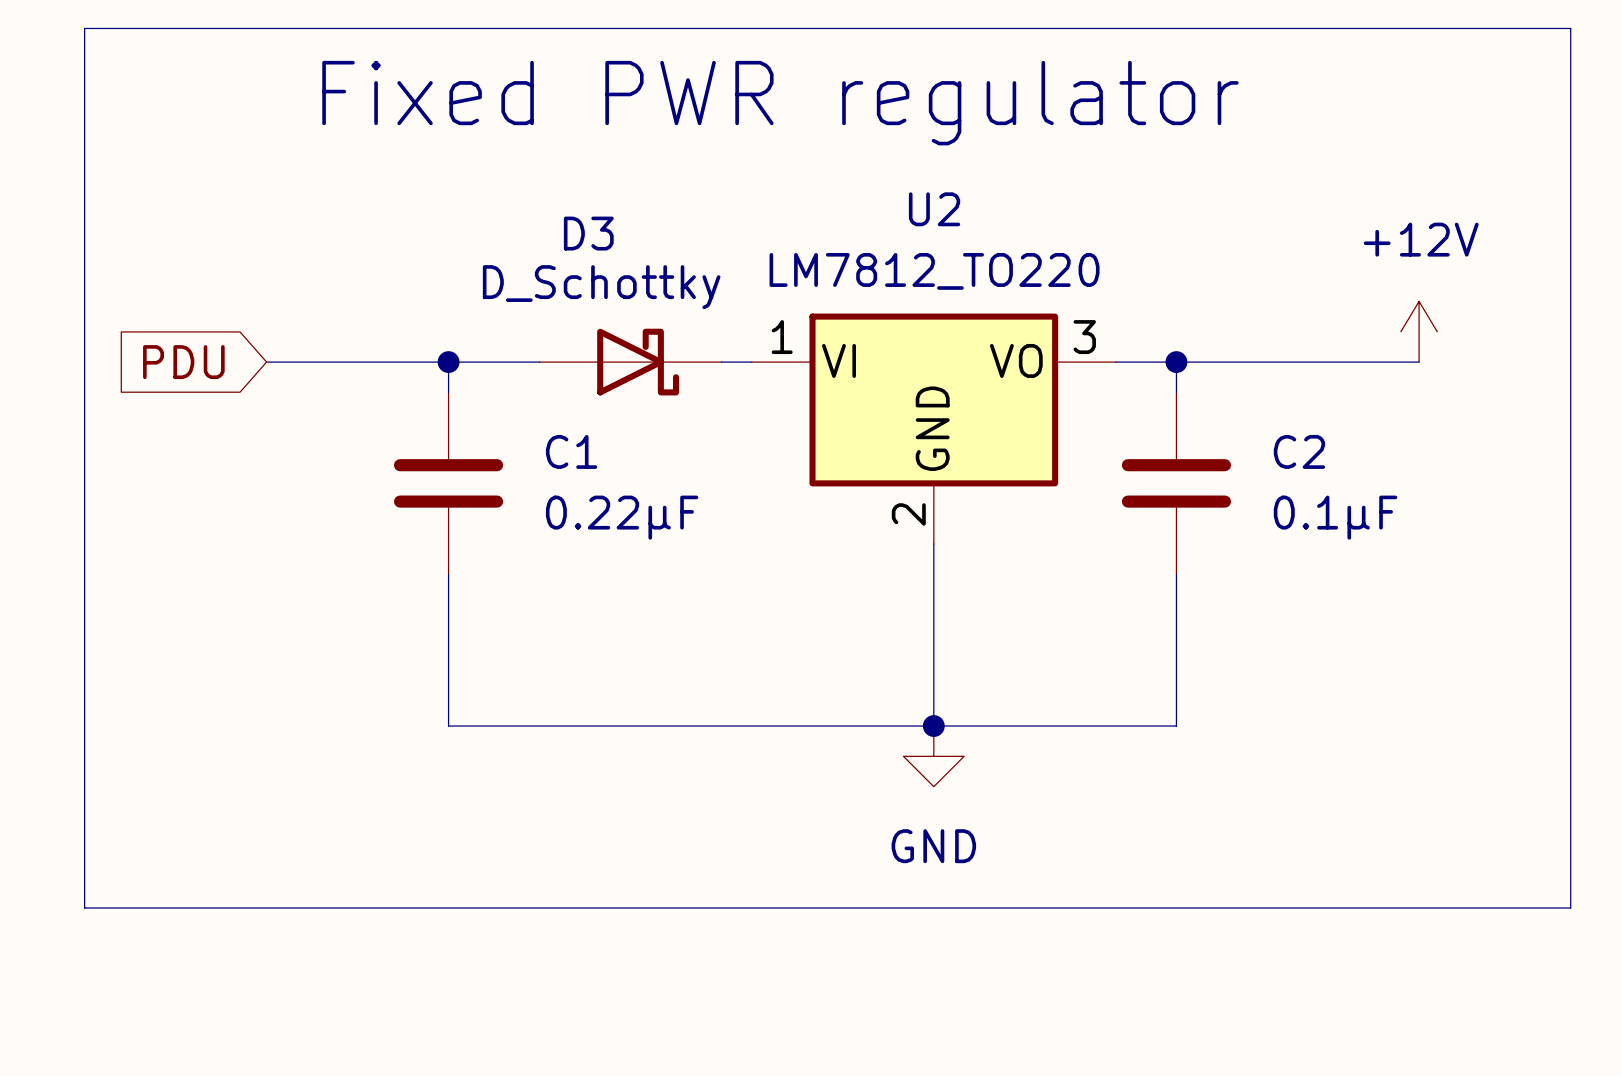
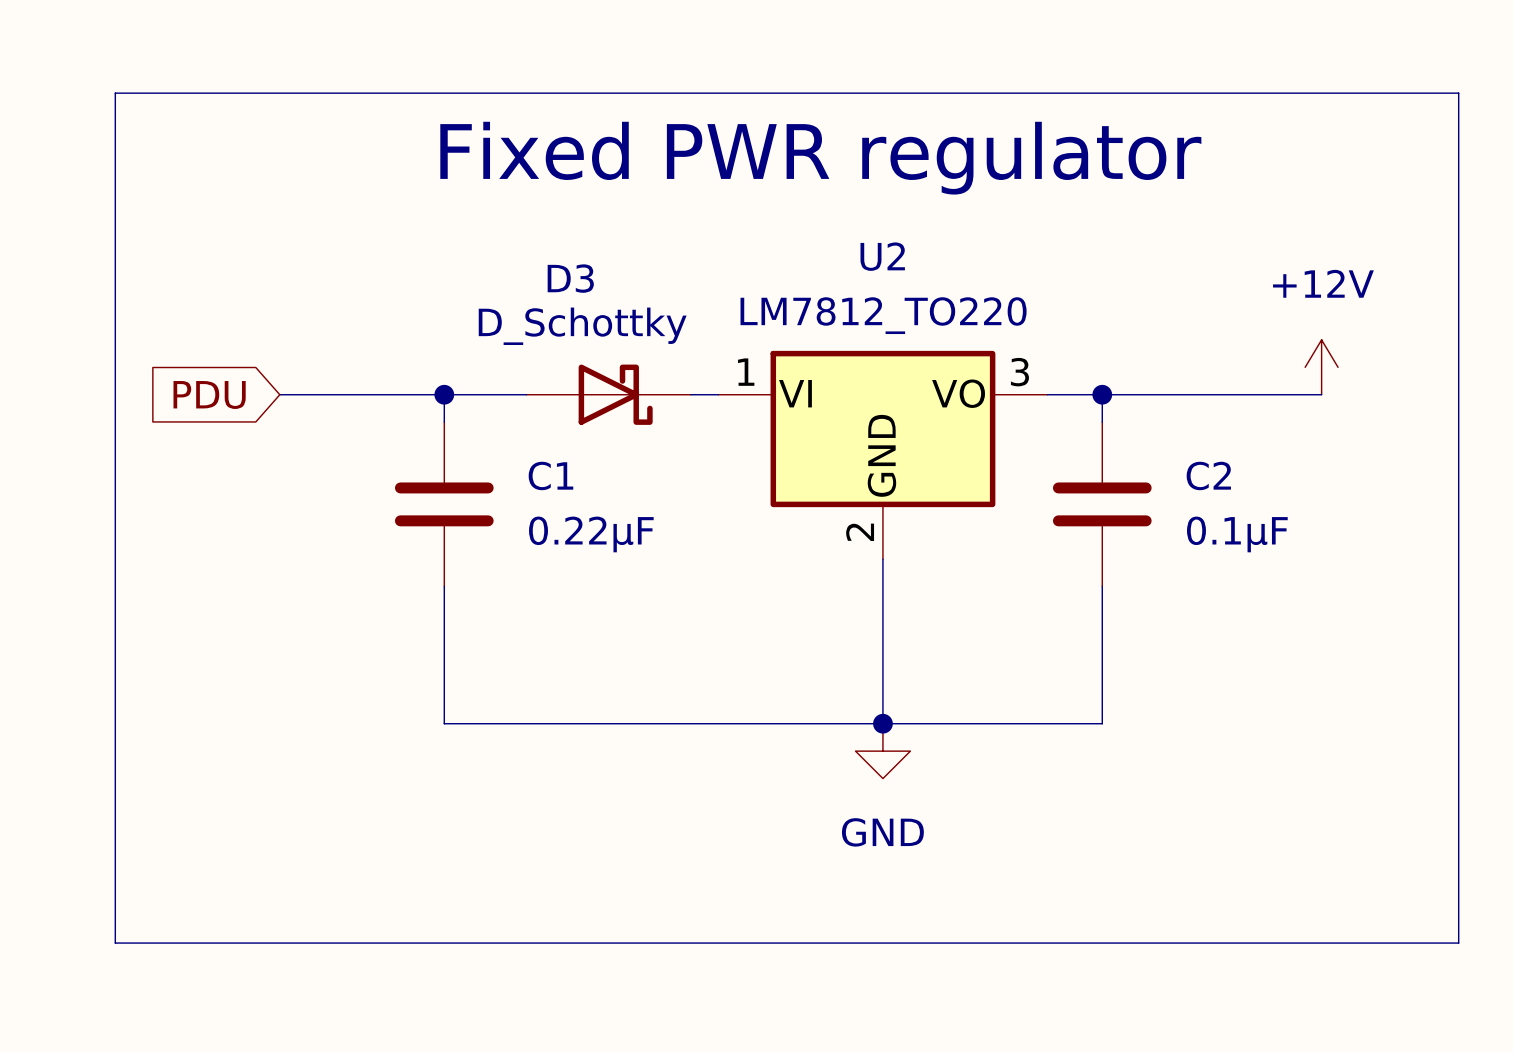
text position: Fixed PWR regulator (780, 103) -> Fixed PWR regulator (820, 158)
line: (84, 907) (1570, 907) -> (115, 888) (115, 943) (1458, 943) (1458, 888)

